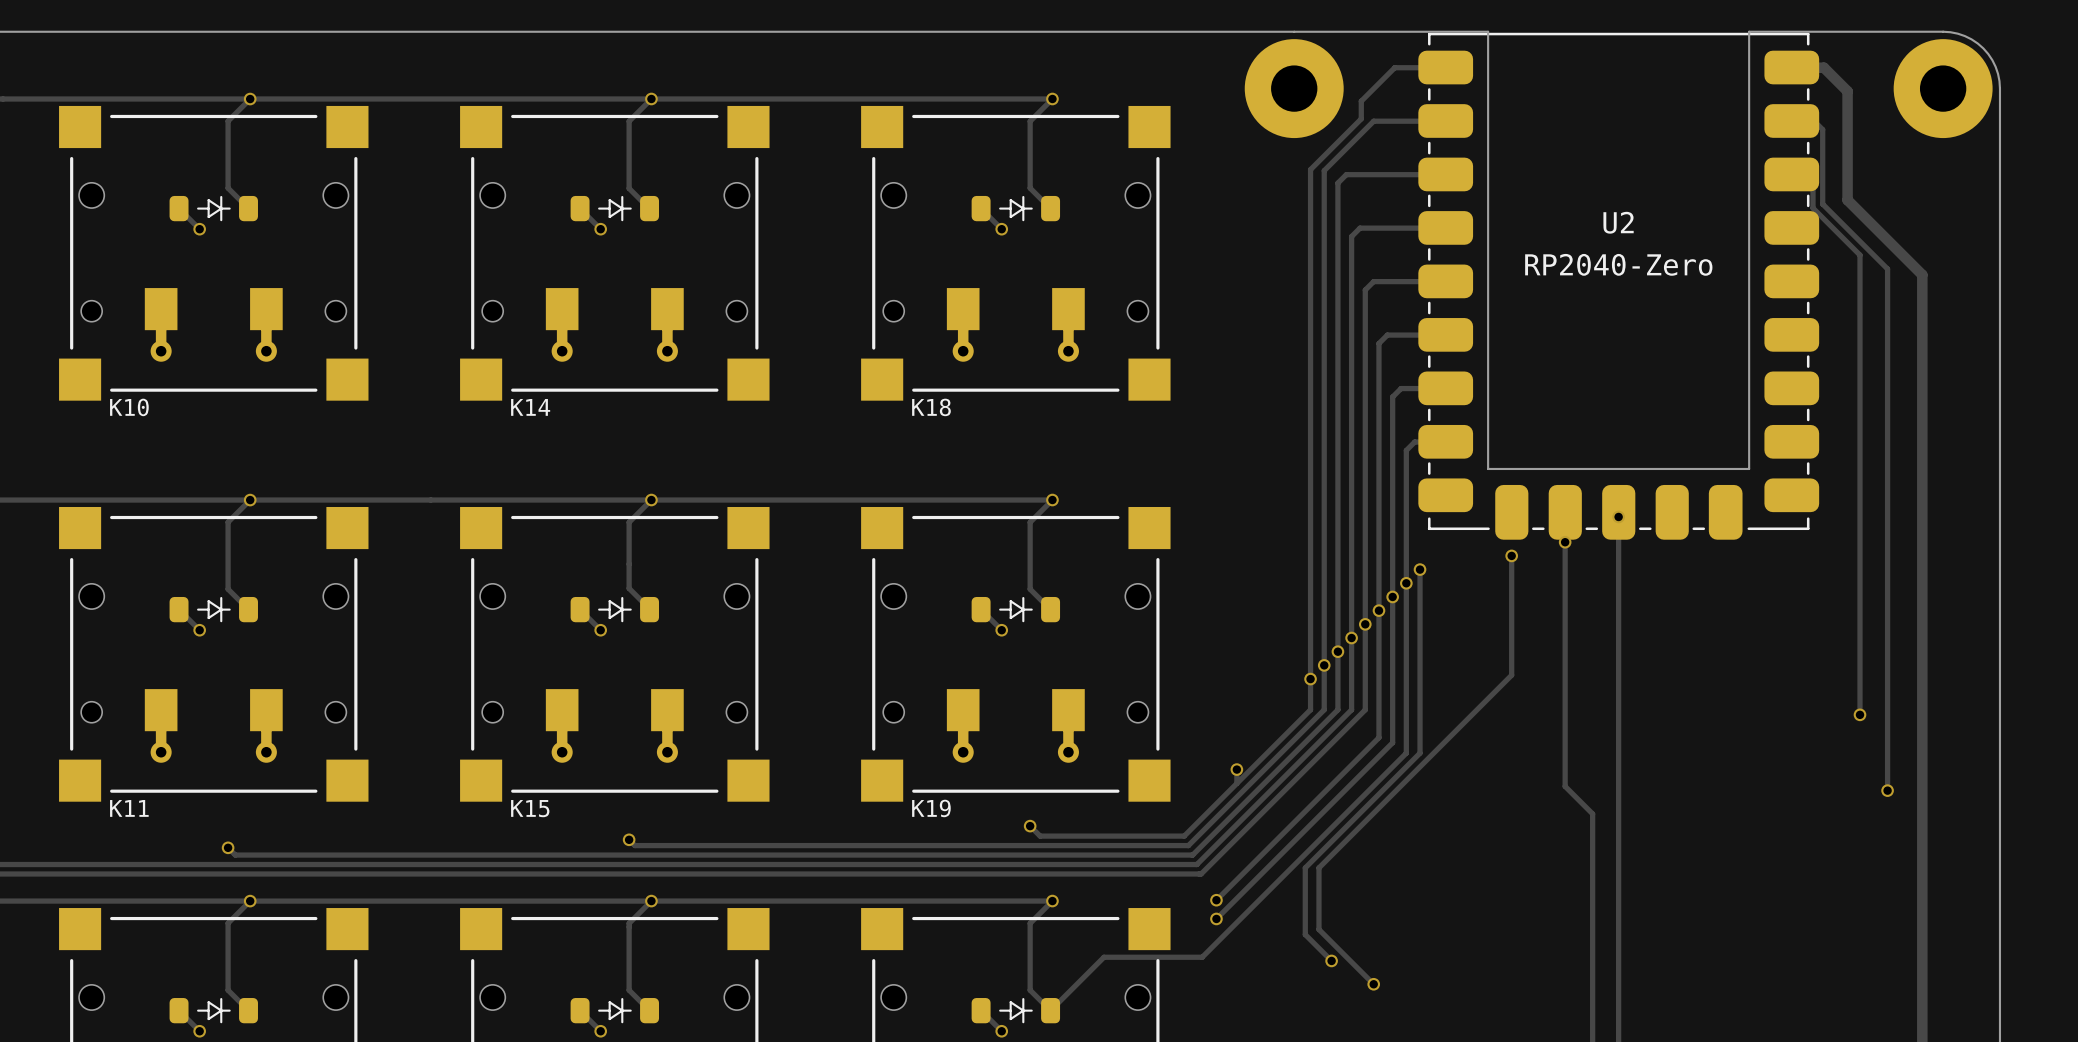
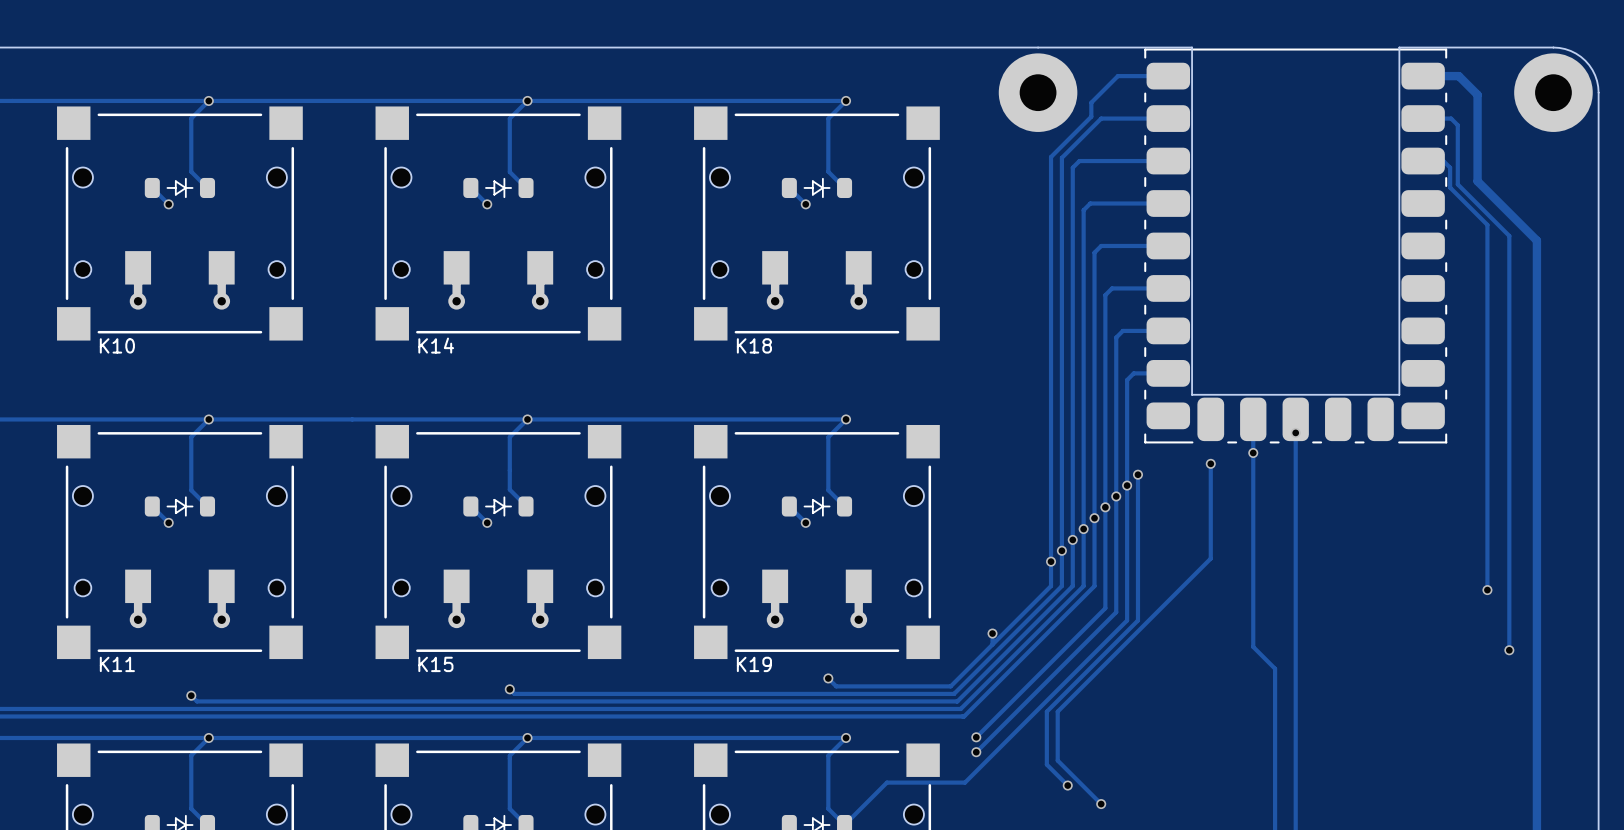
part: none -> (1295, 245)
U2: RP2040-Zero (1618, 286) -> none

